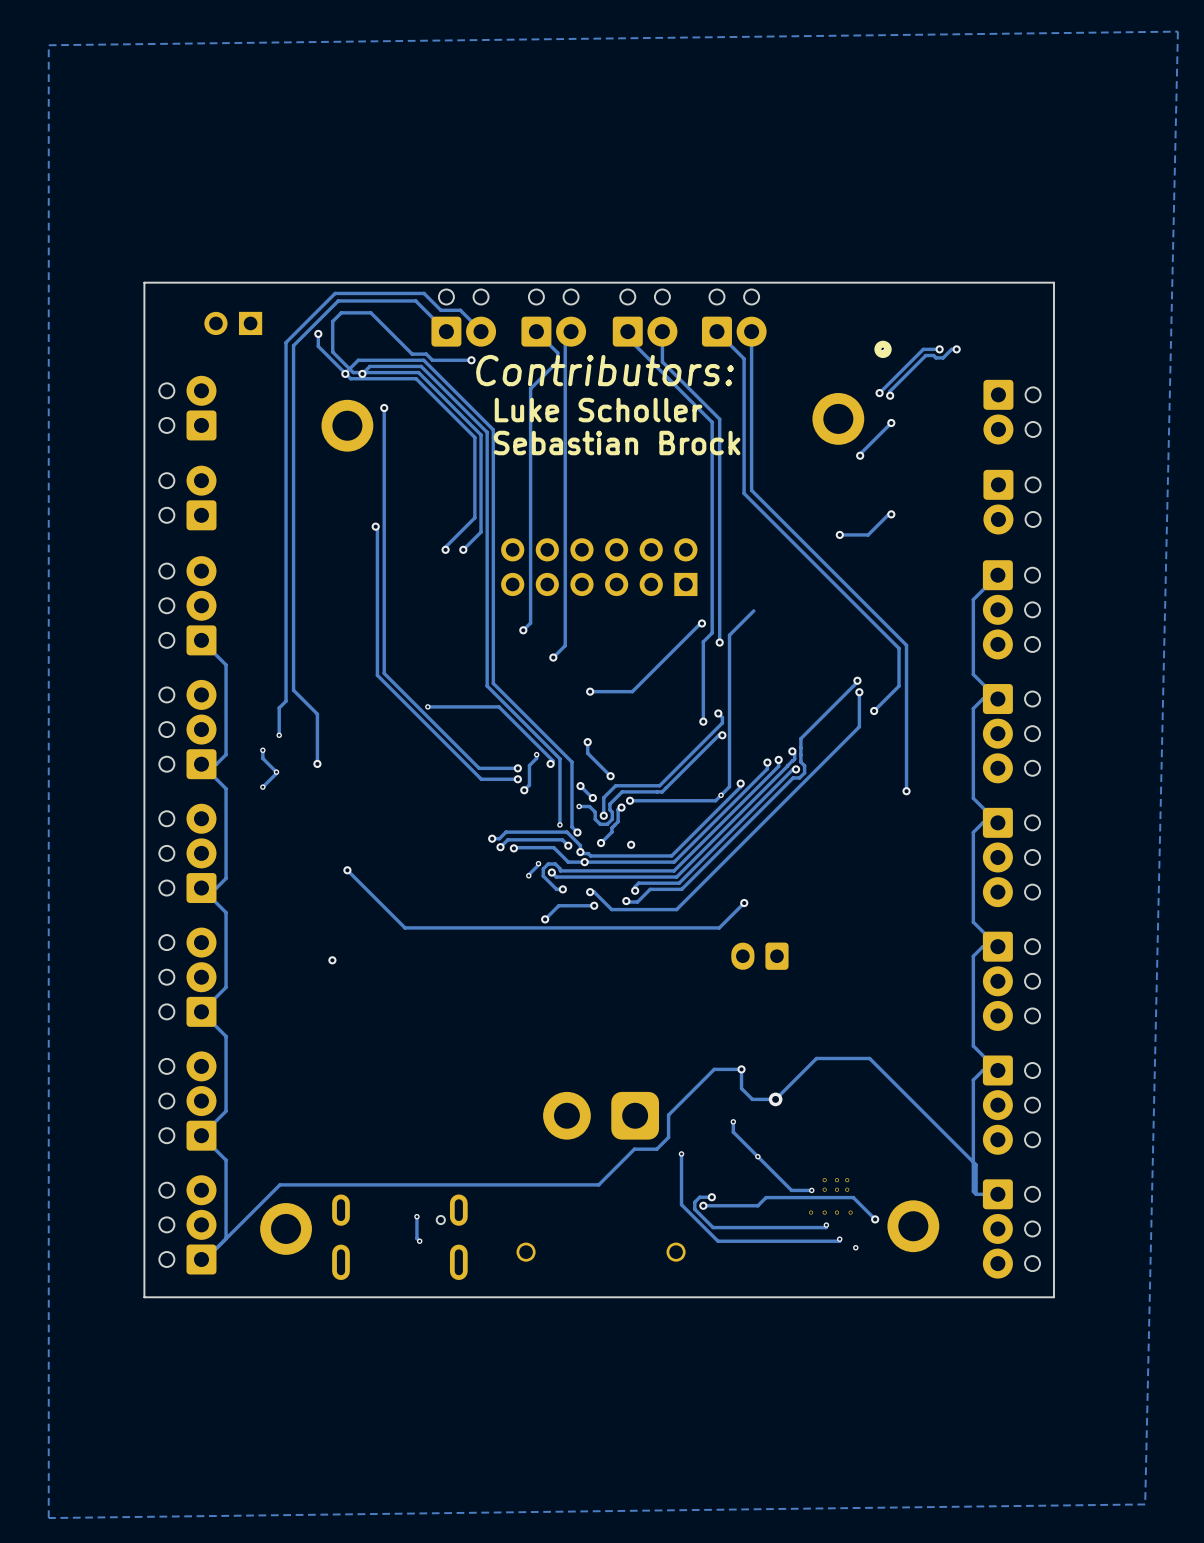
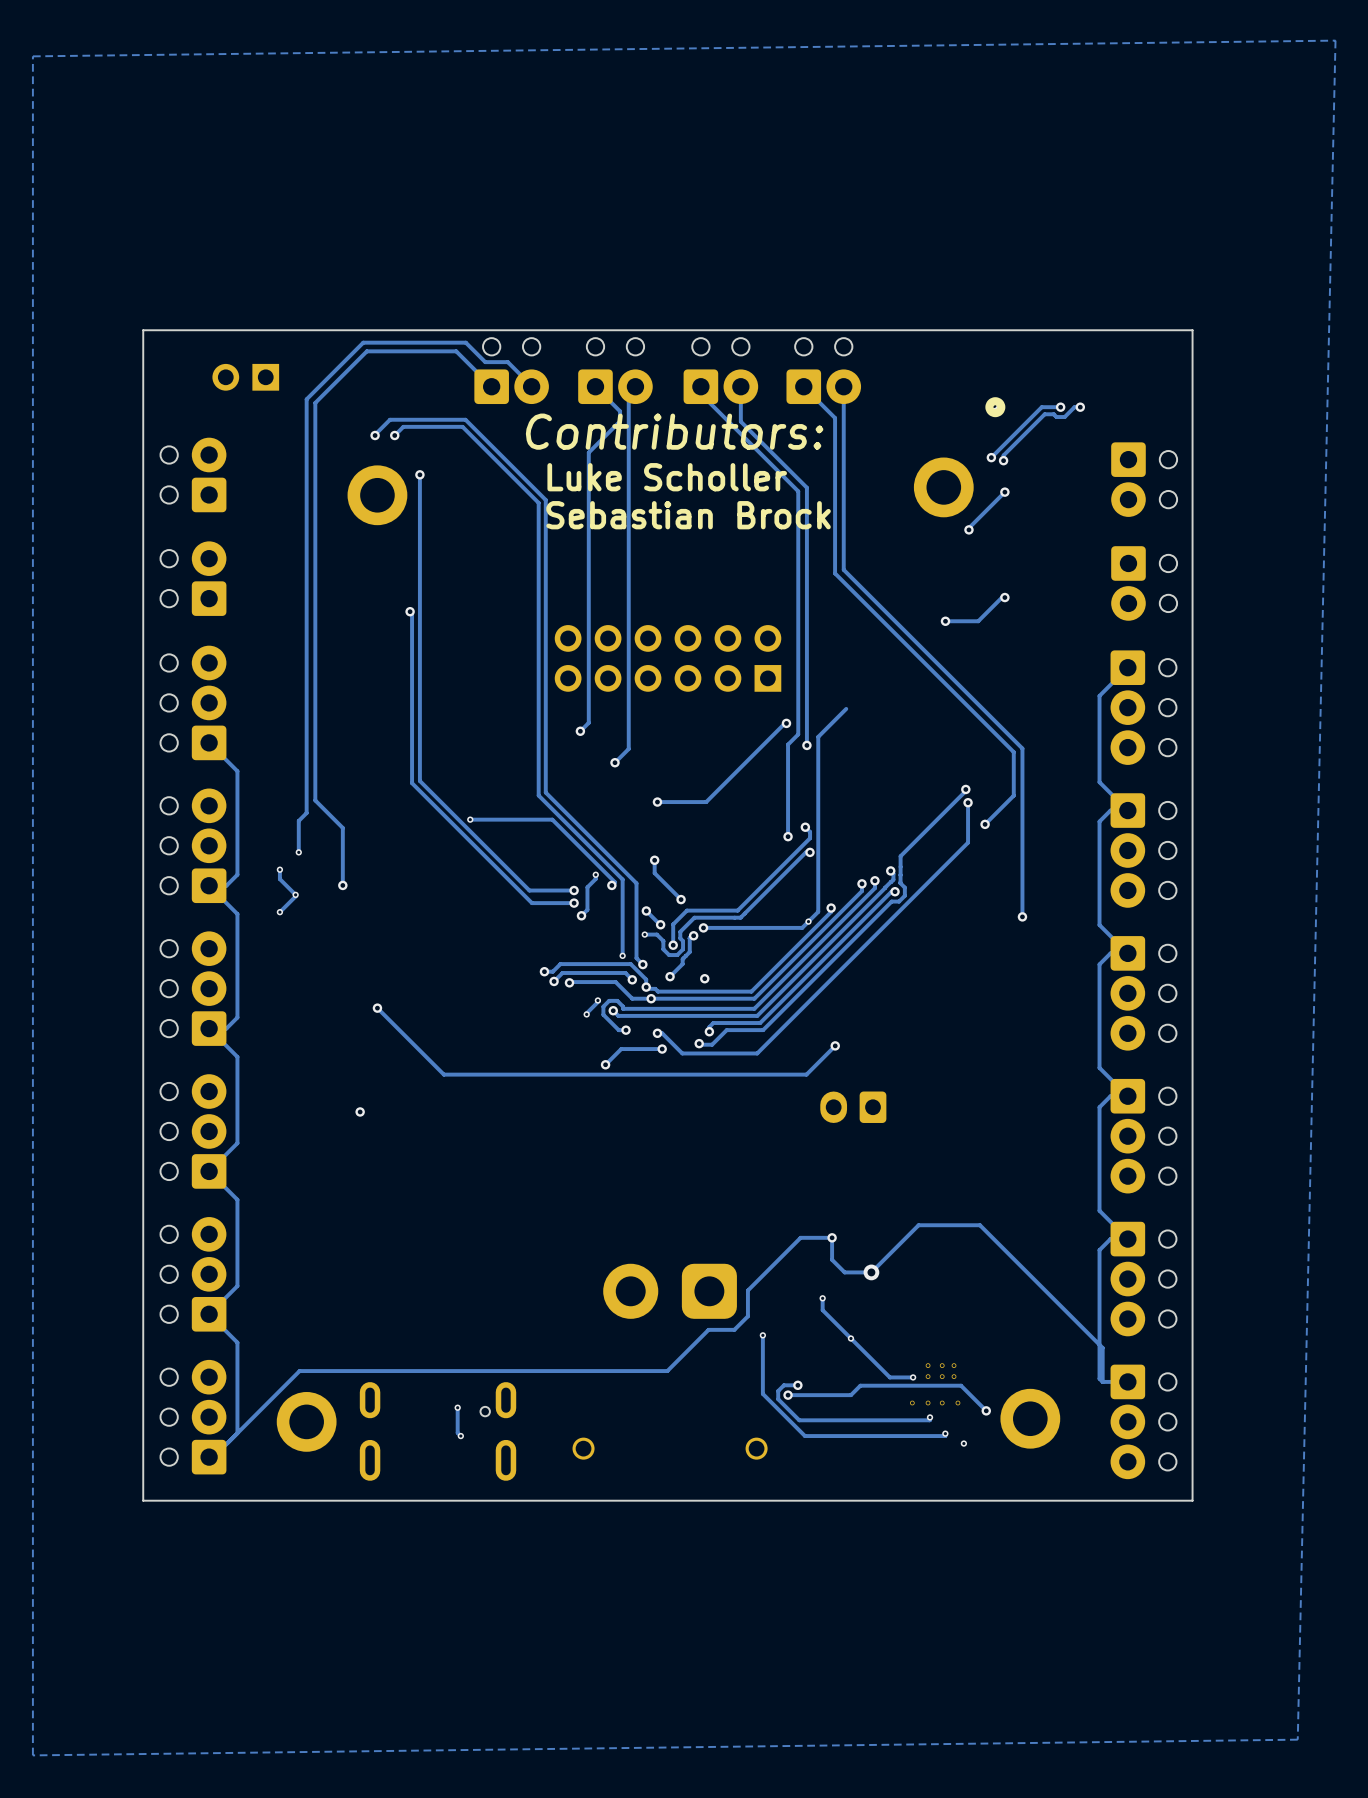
track: (318, 333) (318, 346) (350, 378) (416, 378) (474, 437) (474, 517) (445, 547) (445, 549) -> none
via: (318, 333) -> none
track: (471, 360) (432, 360) (426, 354) (412, 354) (370, 312) (341, 312) (332, 321) (332, 352) (353, 372) (418, 372) (481, 434) (481, 532) (463, 549) -> none
via: (471, 360) -> none
via: (445, 549) -> none
via: (463, 549) -> none

